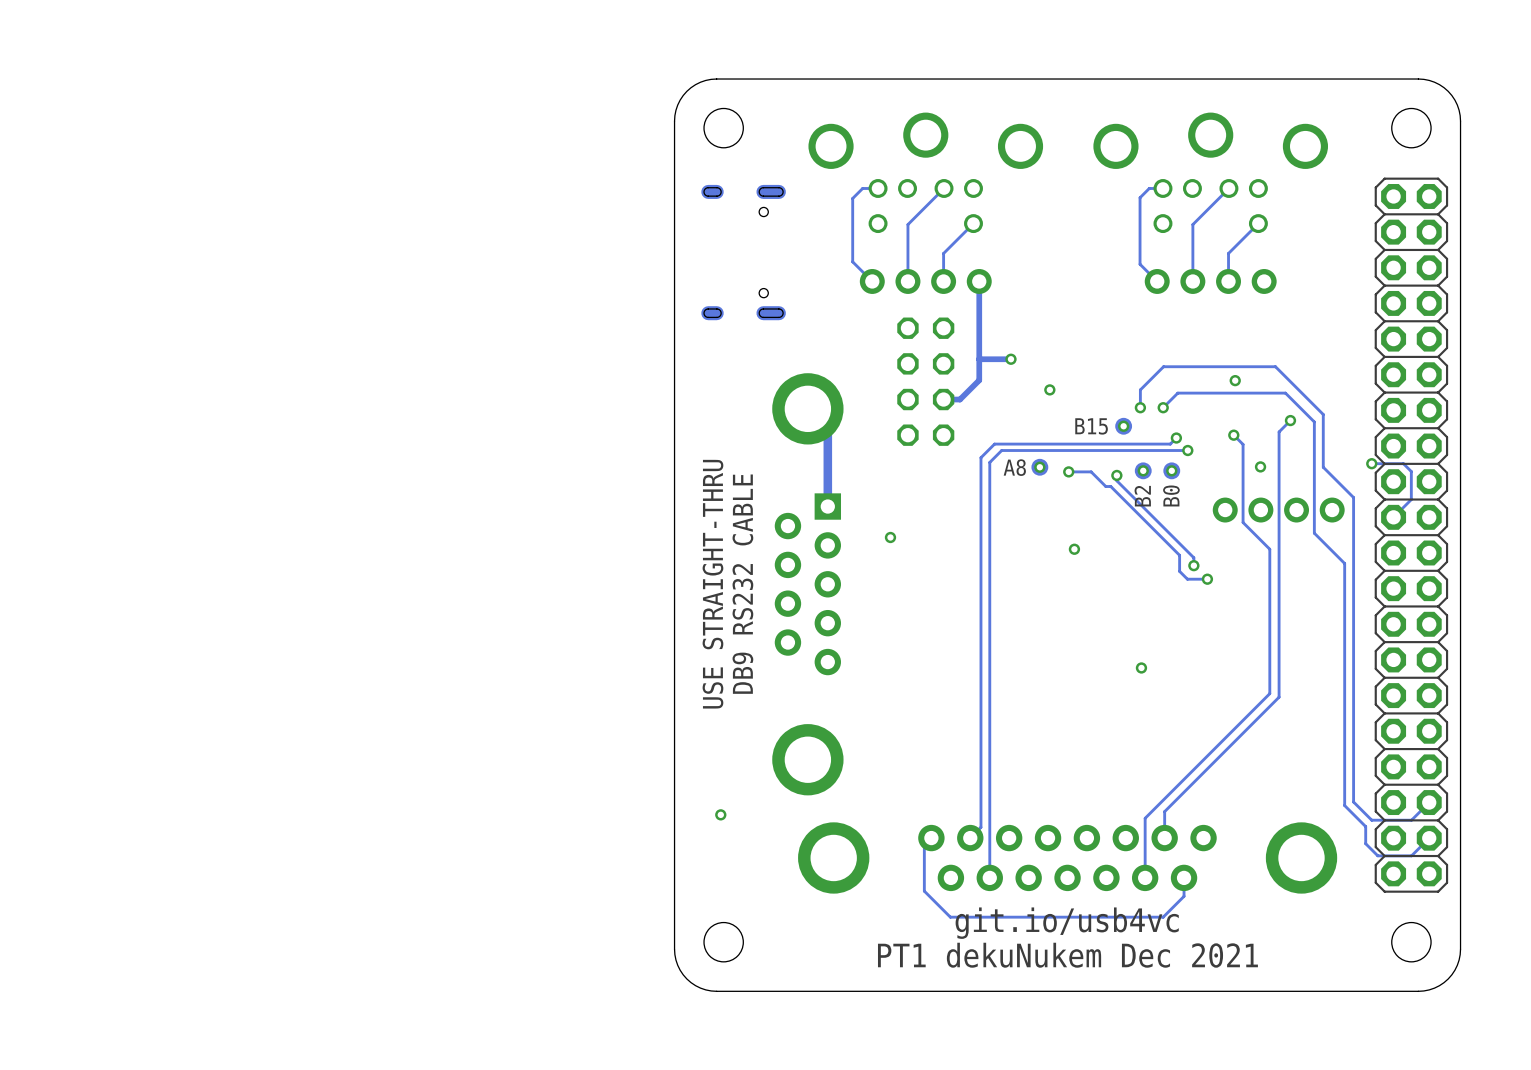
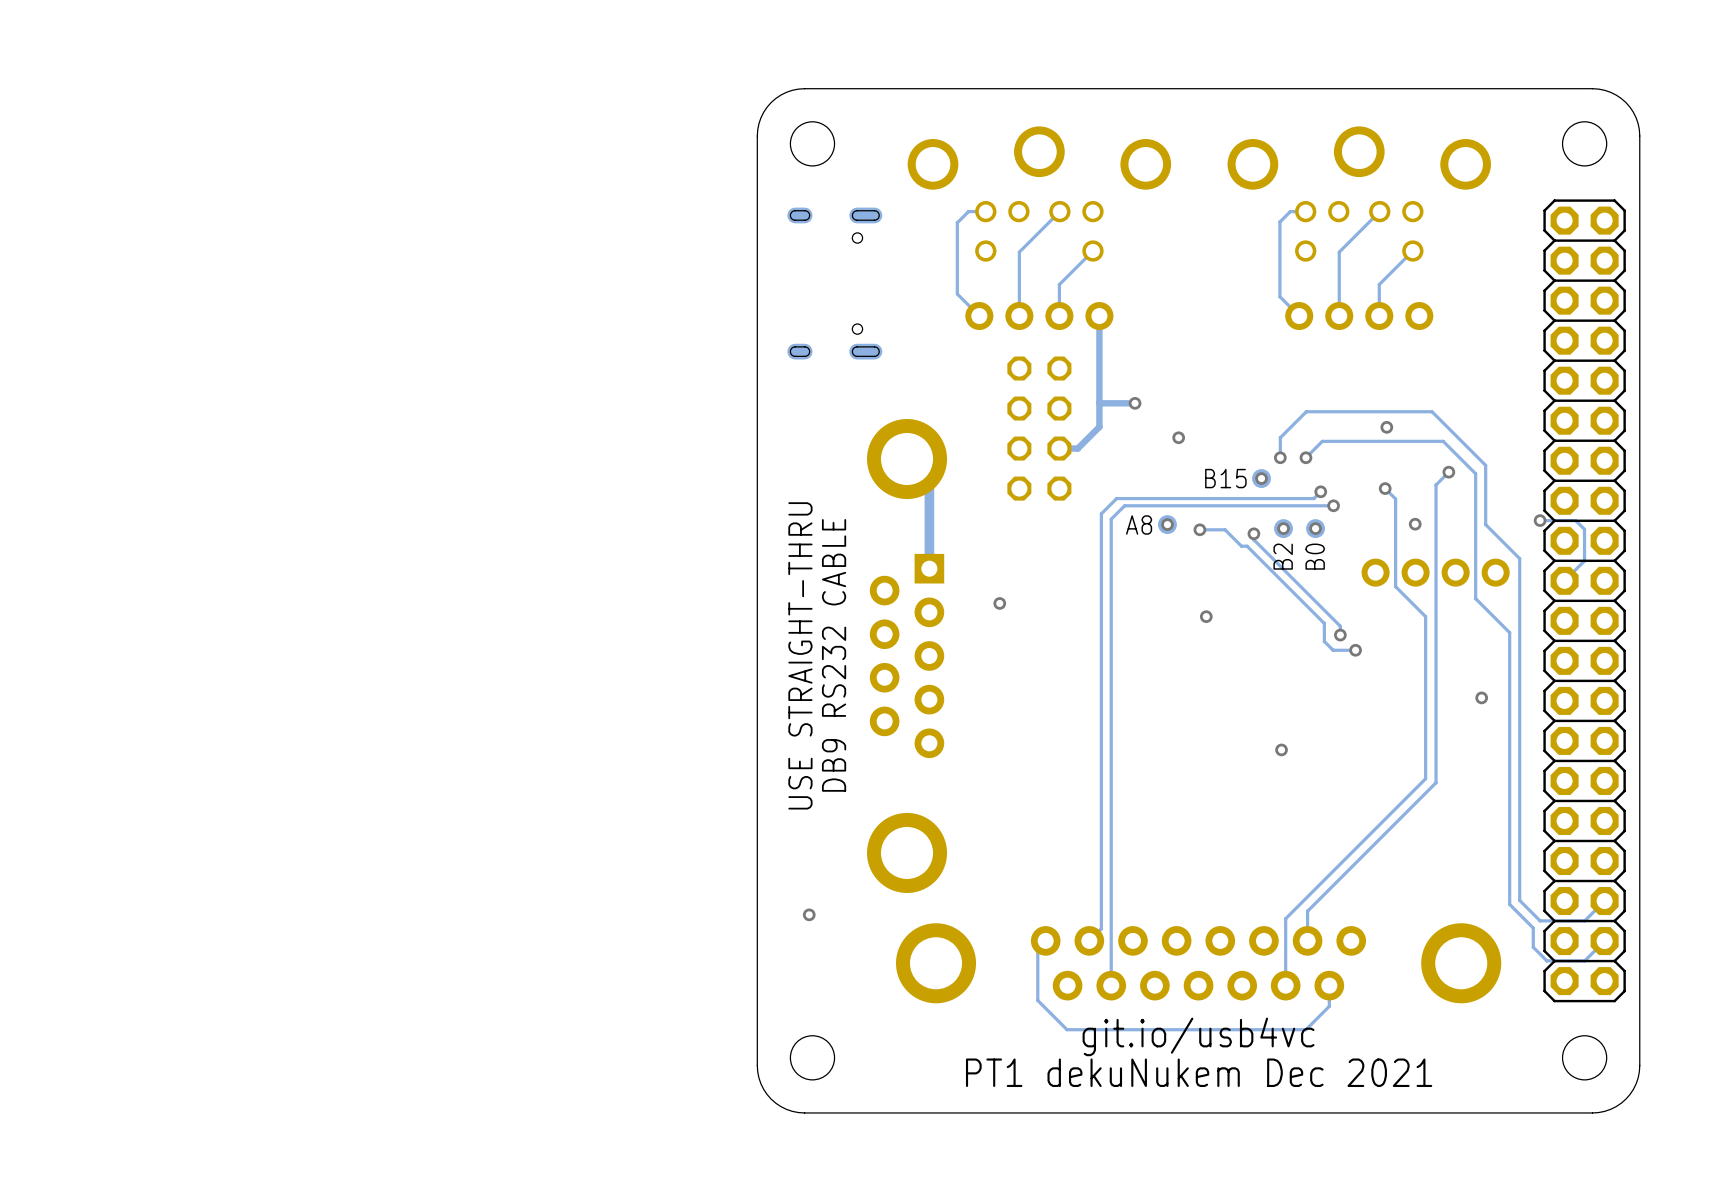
via: none -> (1481, 697)

